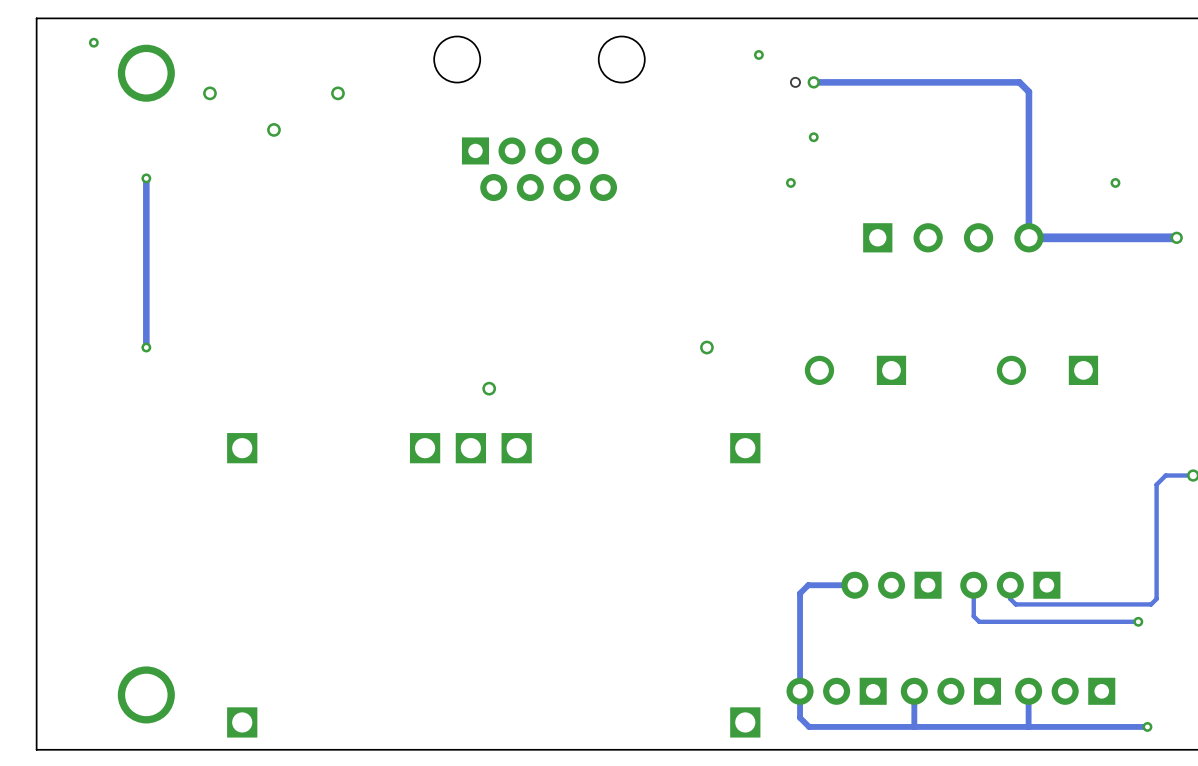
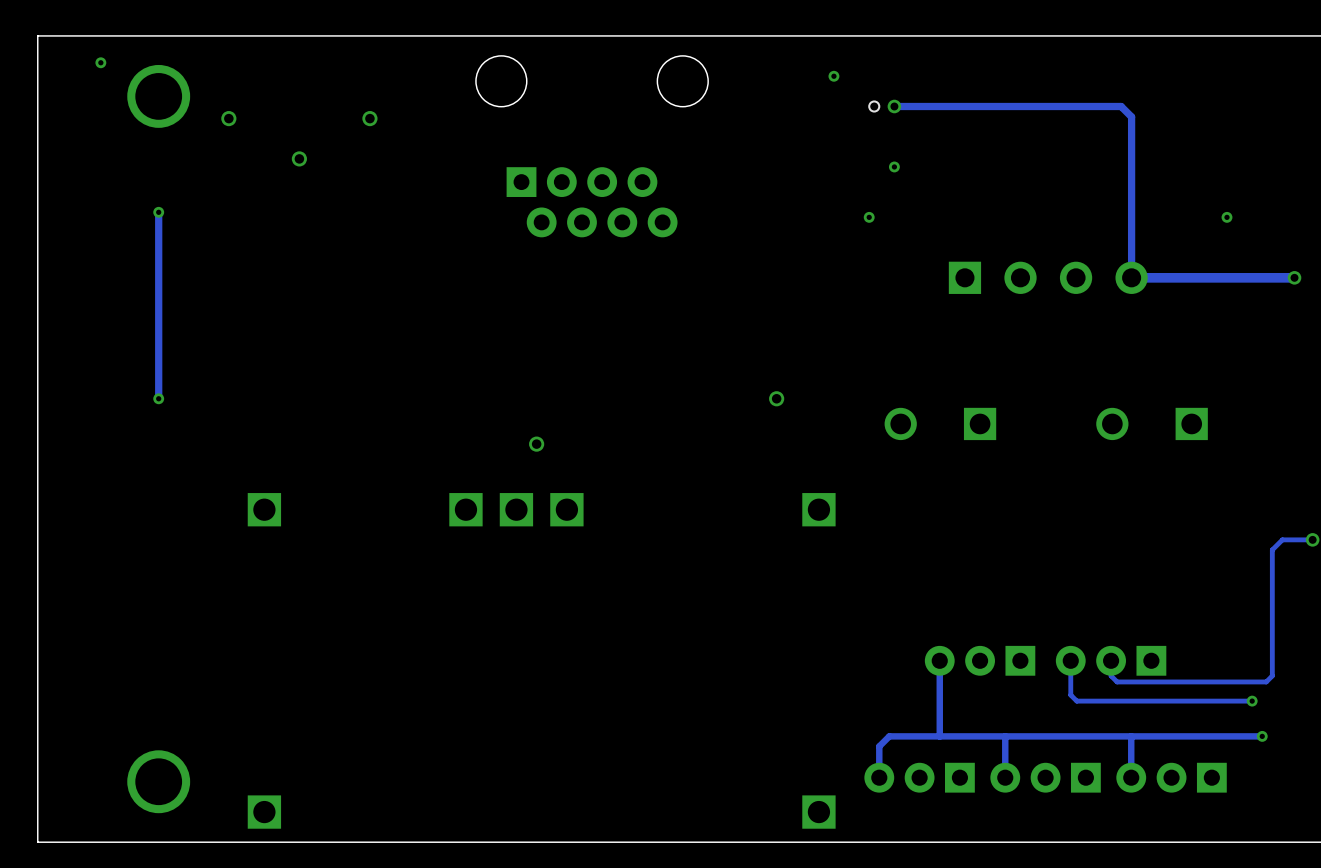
track: (854, 585) (808, 585) (800, 593) (800, 662) -> (939, 660) (939, 736)
track: none -> (1262, 736) (889, 736) (879, 746)
track: (800, 691) (800, 717) (809, 726) (1147, 726) -> none
track: (914, 691) (914, 726) -> (1005, 777) (1005, 736)
track: (1028, 691) (1028, 726) -> (1131, 777) (1131, 736)
via position: (1147, 726) -> (1262, 736)

